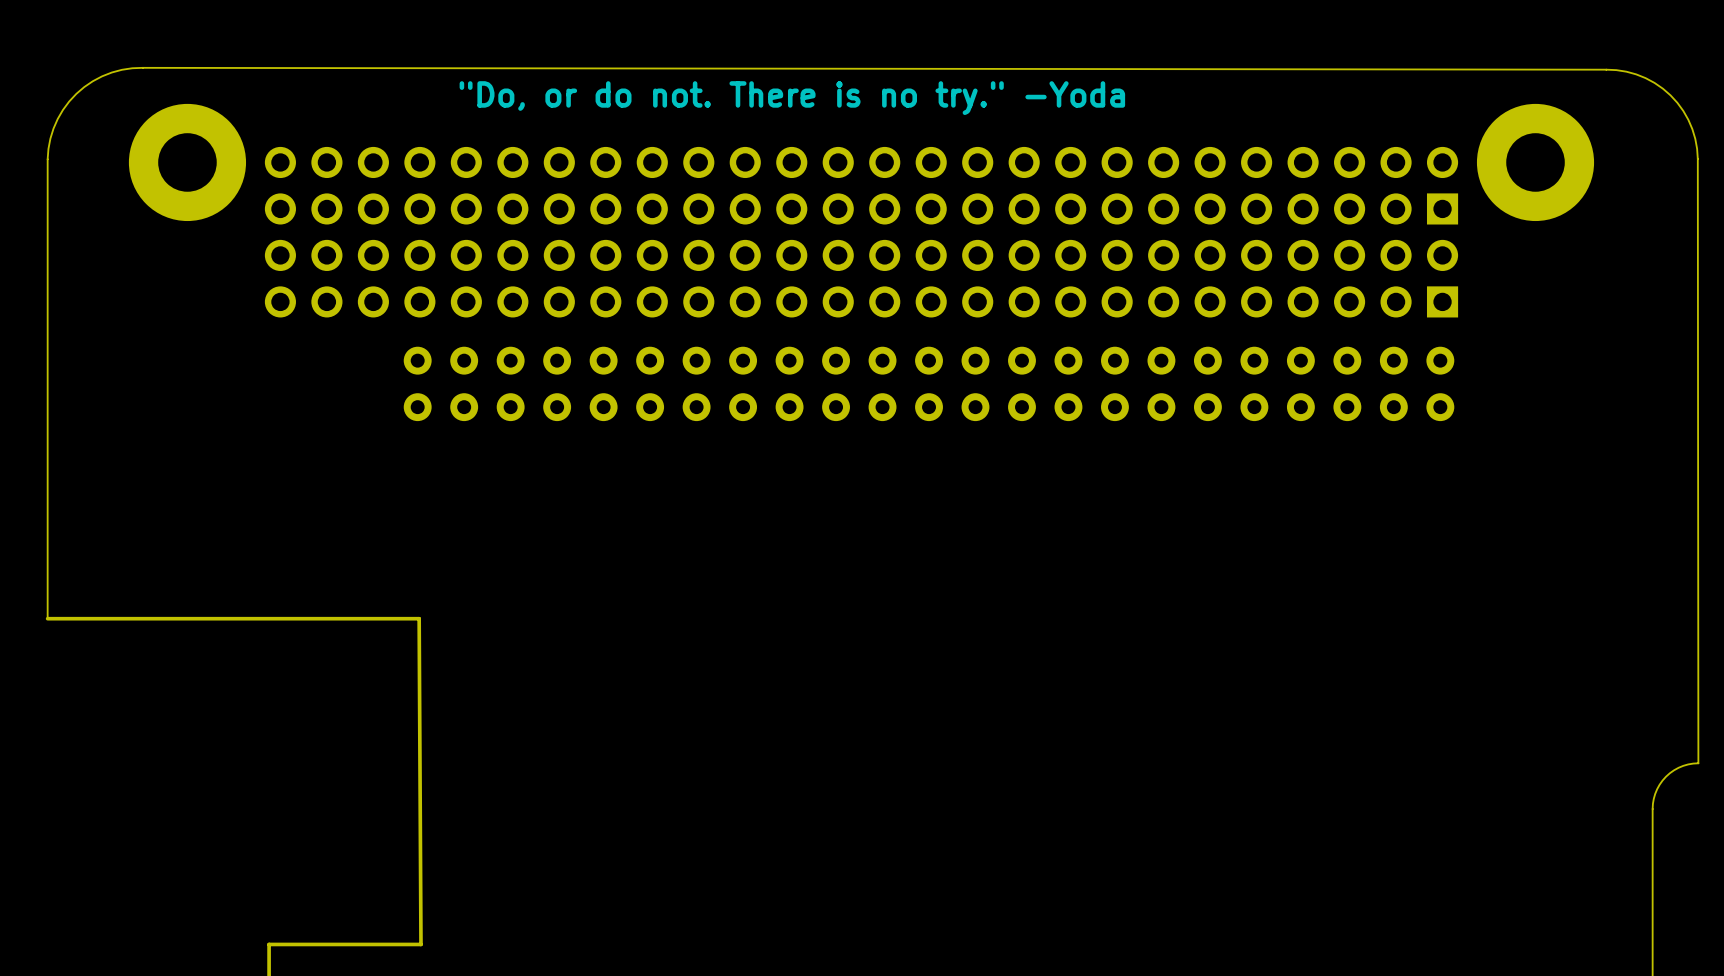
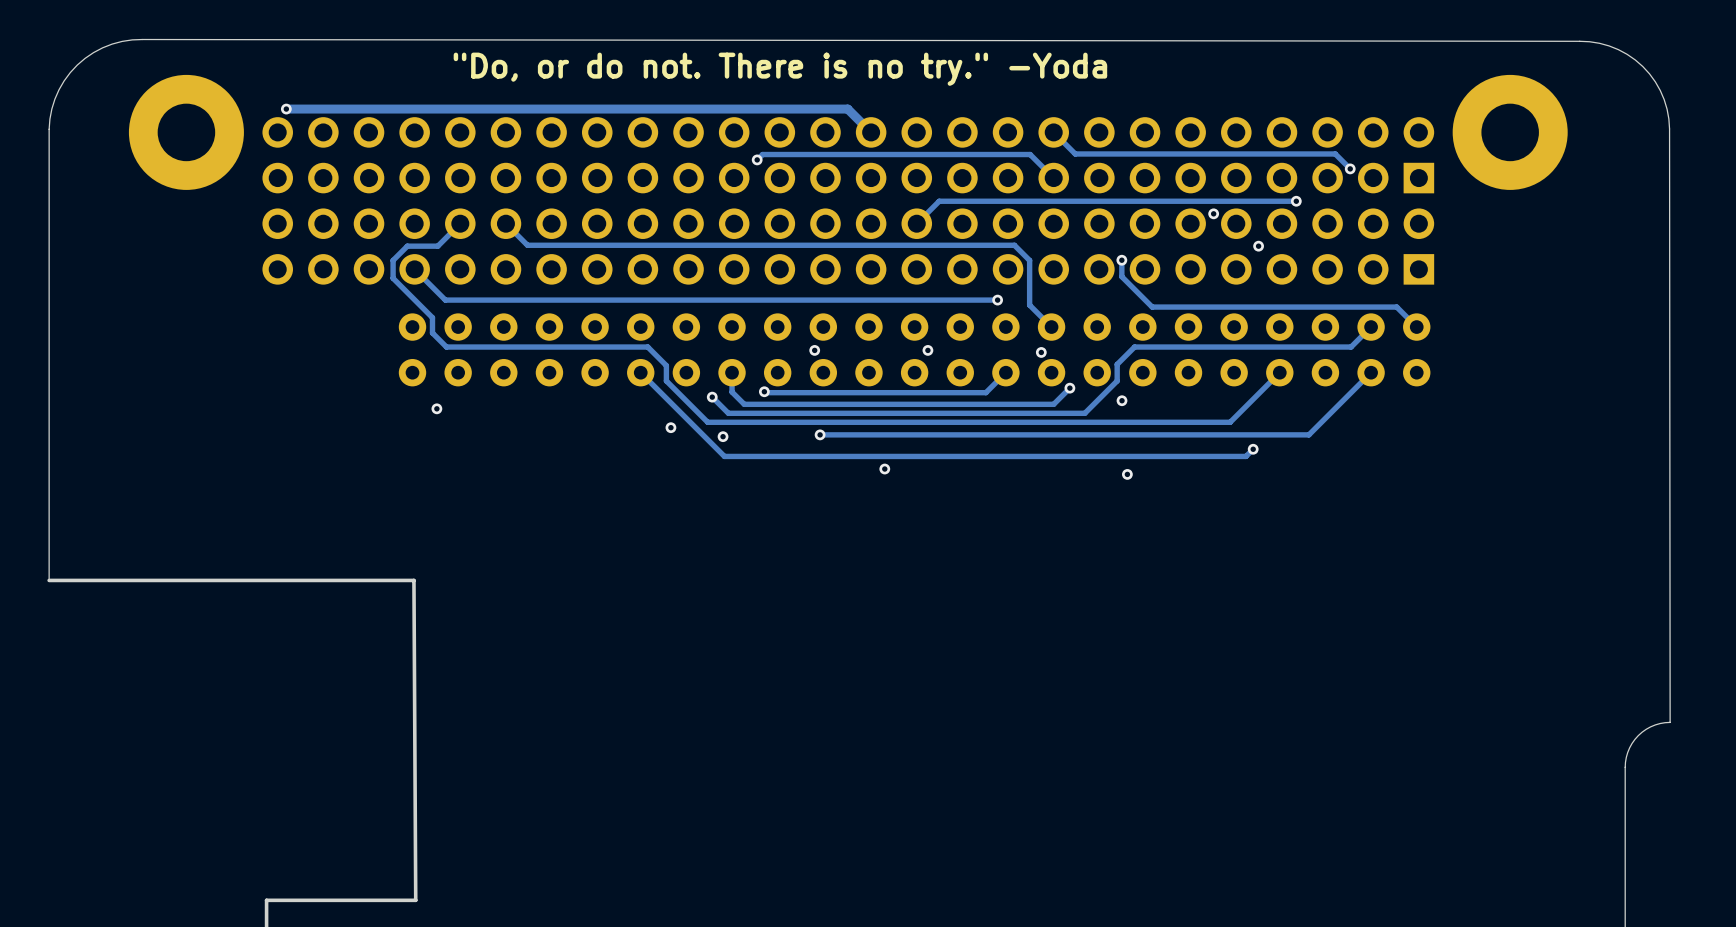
track: none -> (286, 109) (847, 109) (871, 132)
via: none -> (286, 109)
track: none -> (1053, 132) (1075, 153) (1335, 153) (1350, 168)
track: none -> (757, 159) (762, 154) (1030, 154) (1053, 178)
via: none -> (757, 159)
via: none -> (1350, 168)
track: none -> (1296, 201) (939, 201) (916, 223)
via: none -> (1296, 201)
via: none -> (1213, 213)
track: none -> (460, 223) (437, 246) (407, 246) (393, 260) (393, 278) (432, 317) (432, 333) (446, 347) (647, 347) (666, 365) (666, 380) (707, 422) (1230, 422) (1279, 372)
track: none -> (505, 223) (527, 245) (1014, 245) (1029, 260) (1029, 305) (1051, 327)
via: none -> (1258, 246)
track: none -> (1121, 260) (1121, 276) (1152, 307) (1396, 307) (1416, 327)
via: none -> (1121, 260)
track: none -> (414, 269) (445, 300) (997, 300)
via: none -> (997, 300)
track: none -> (1371, 327) (1351, 347) (1134, 347) (1117, 364) (1117, 380) (1084, 413) (728, 413) (712, 397)
via: none -> (814, 350)
via: none -> (927, 350)
via: none -> (1041, 352)
track: none -> (640, 372) (724, 456) (1246, 456) (1253, 449)
track: none -> (732, 372) (732, 392) (744, 404) (1053, 404) (1069, 388)
track: none -> (1005, 372) (985, 392) (764, 391)
track: none -> (1371, 372) (1308, 434) (820, 434)
via: none -> (1069, 388)
via: none -> (764, 391)
via: none -> (712, 397)
via: none -> (1122, 400)
via: none -> (436, 408)
via: none -> (670, 427)
via: none -> (820, 434)
via: none -> (723, 436)
via: none -> (1253, 449)
via: none -> (884, 469)
via: none -> (1127, 474)

